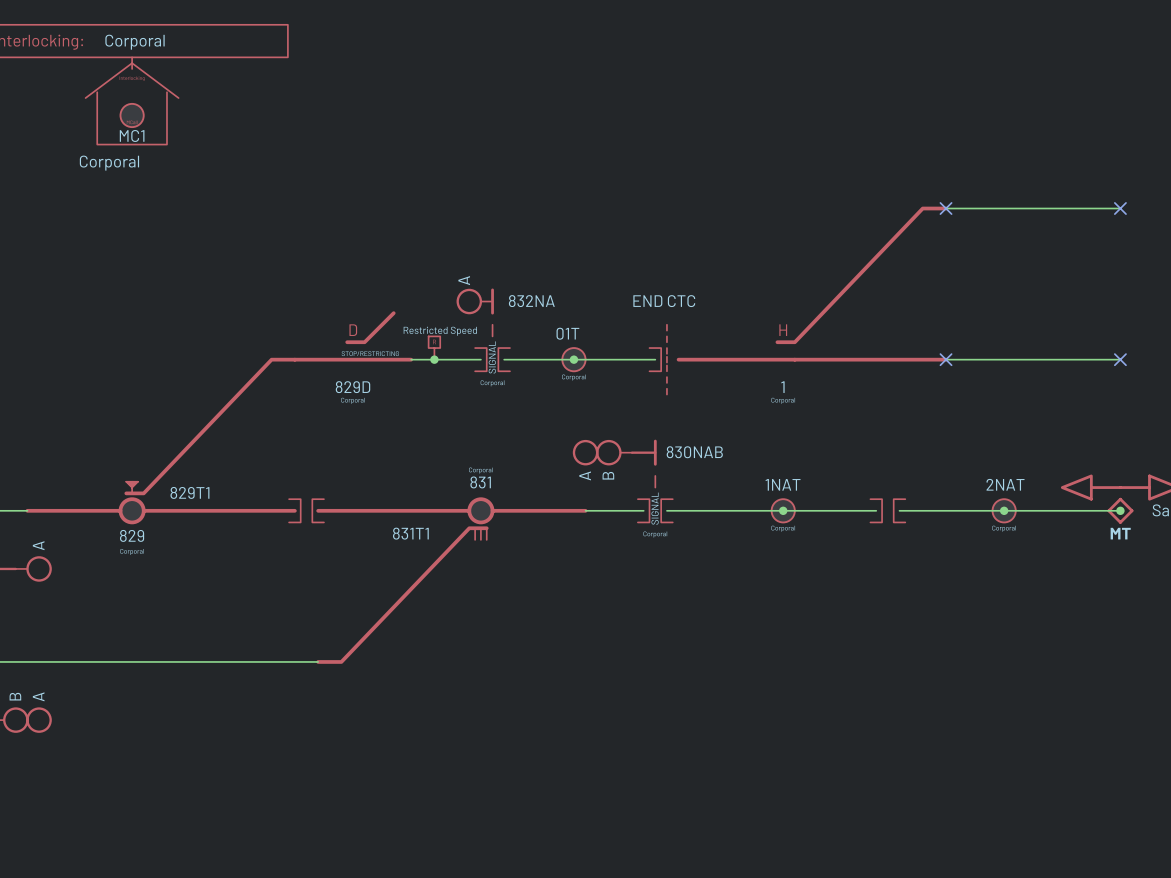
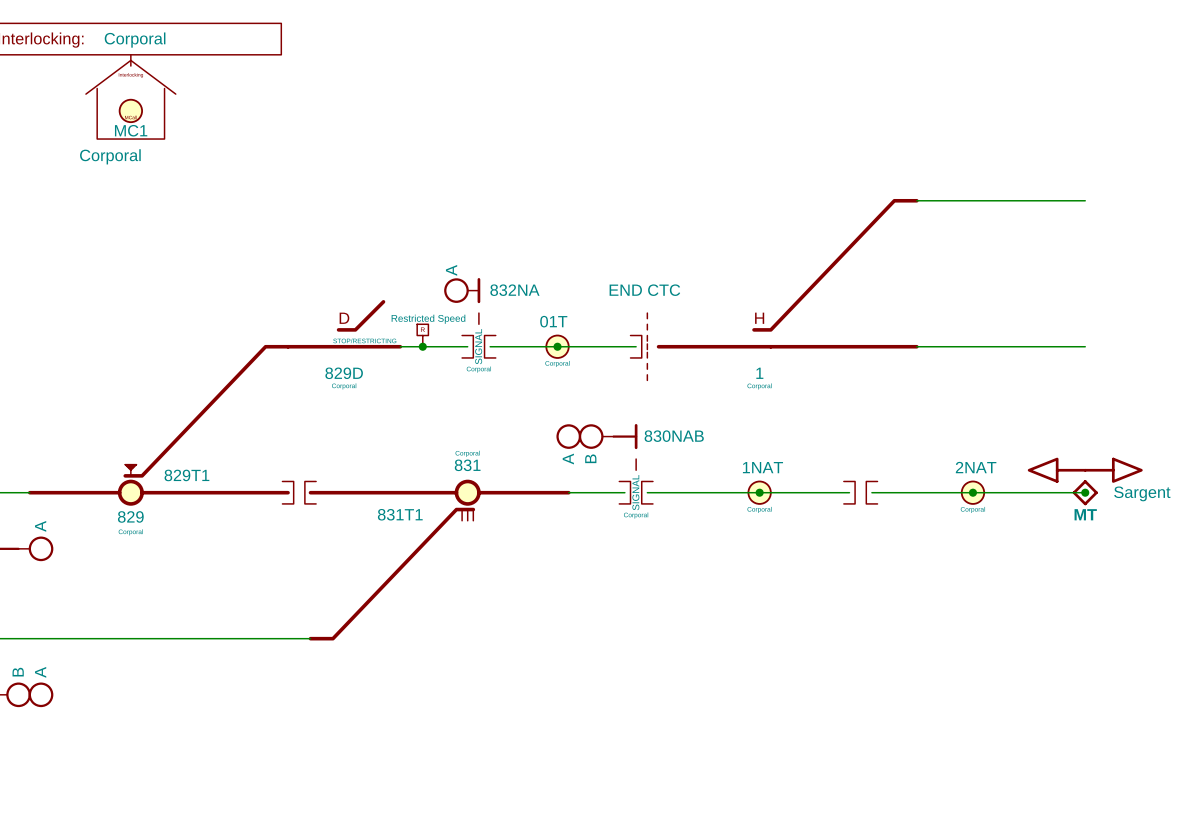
no-connect mark: (946, 208) -> none
no-connect mark: (1120, 208) -> none
no-connect mark: (946, 359) -> none
no-connect mark: (1120, 359) -> none

